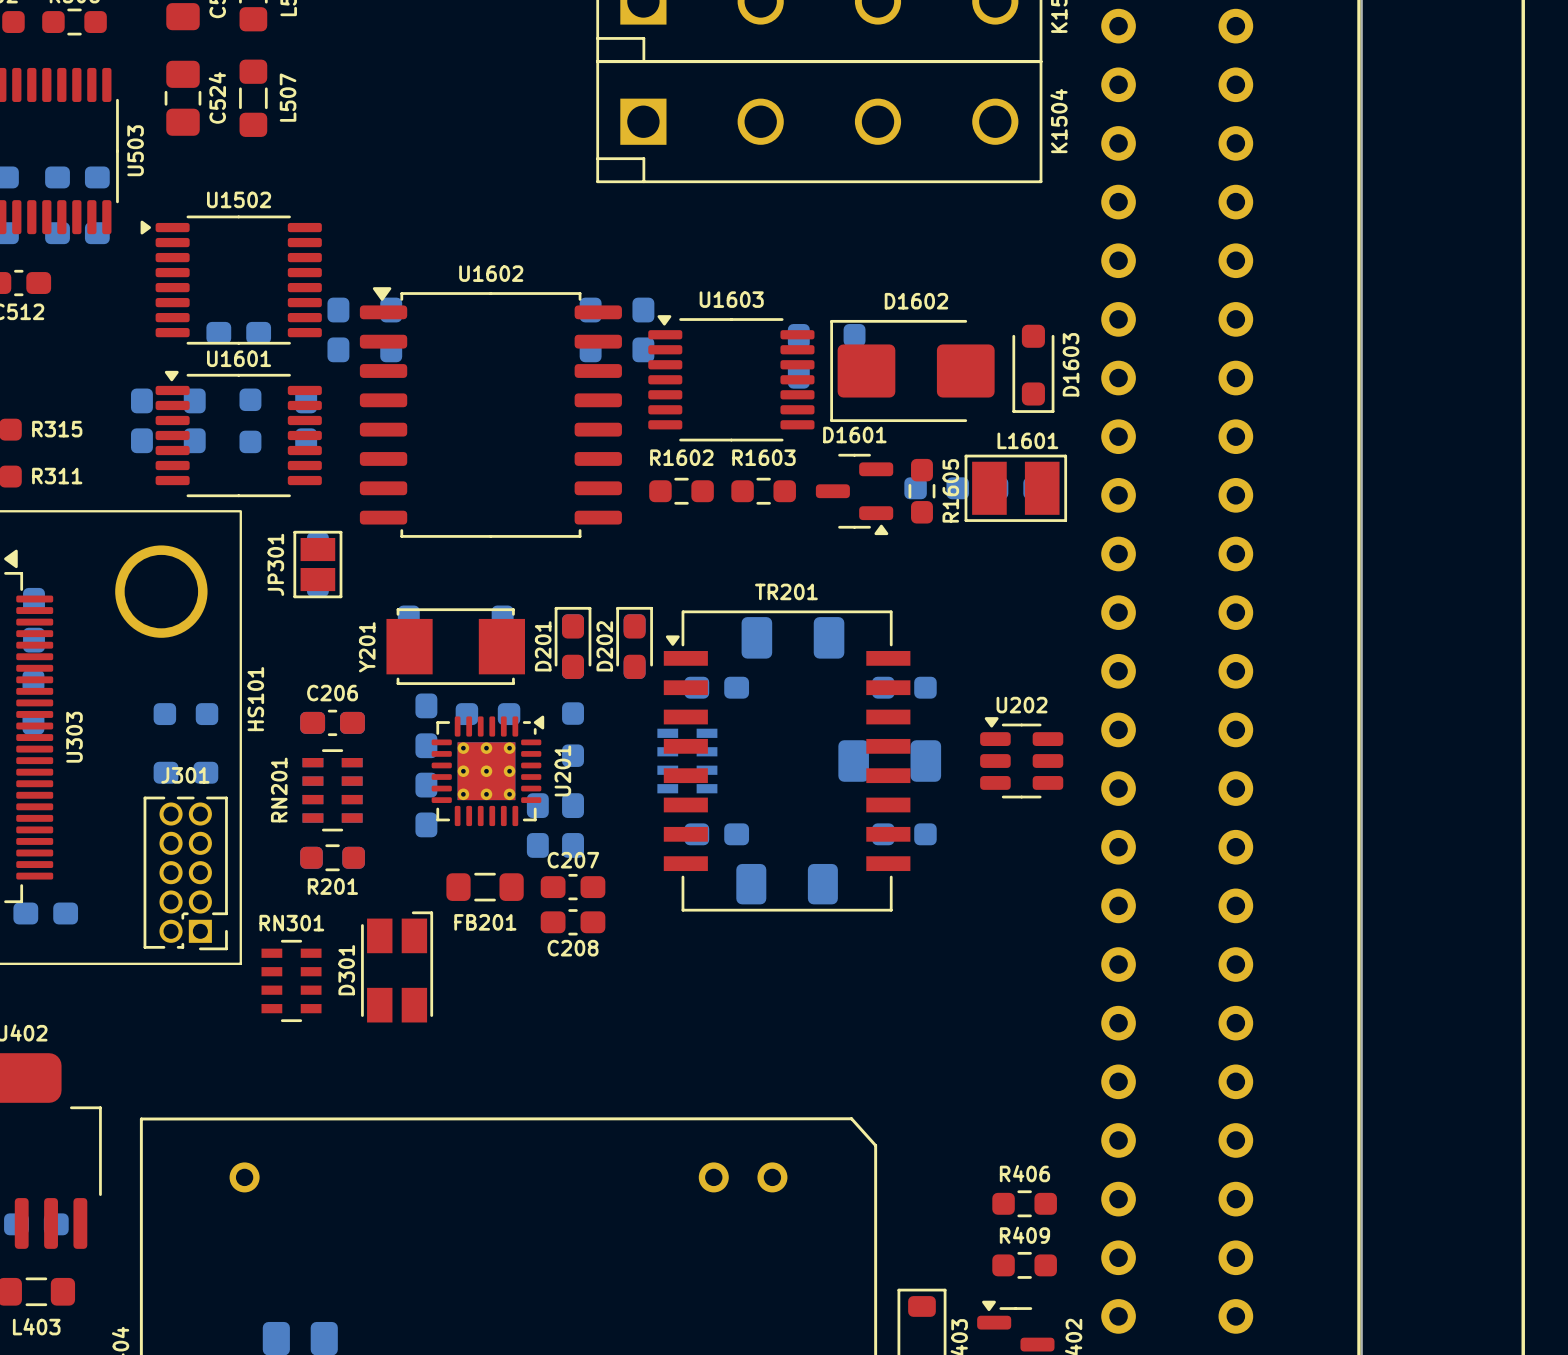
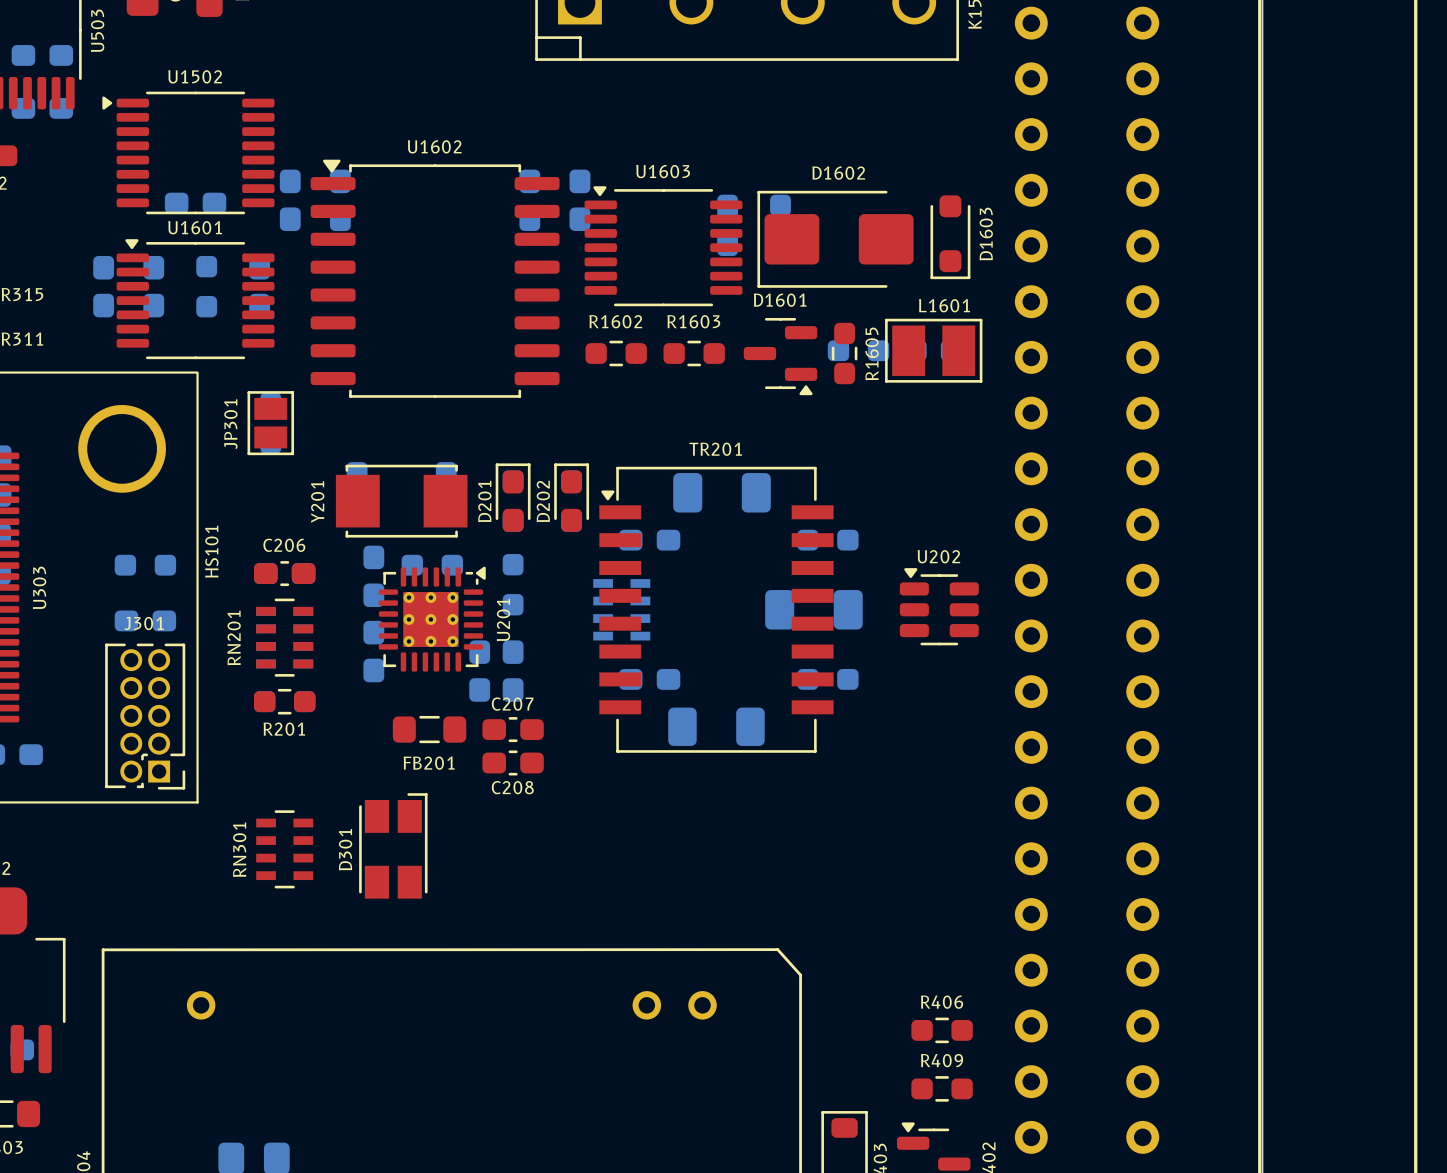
RN301 name rotation: 0° (291, 923) -> 90° counterclockwise (239, 849)
D301 position: (397, 966) -> (393, 845)
RN301 position: (291, 980) -> (284, 849)

